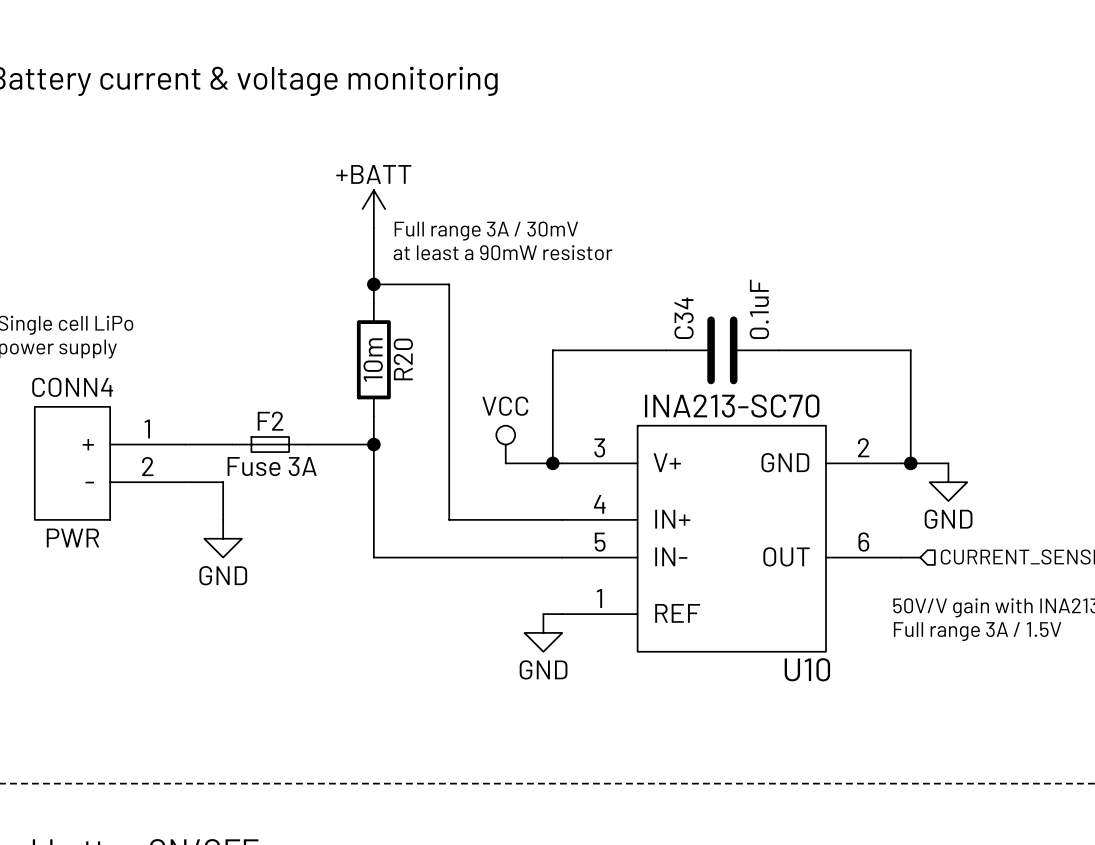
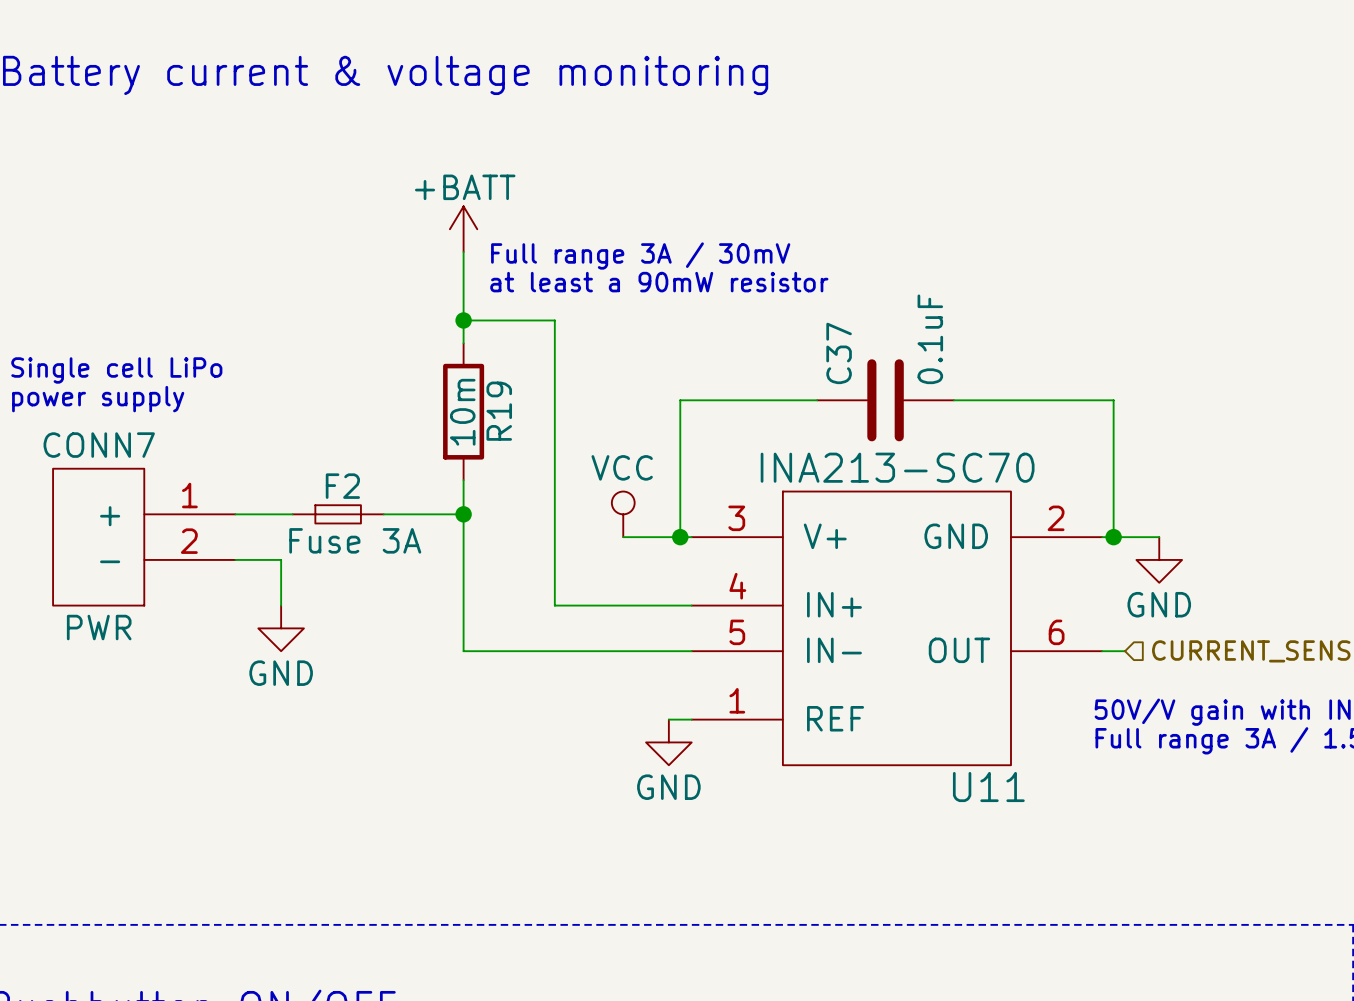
C34 name: C34 (684, 318) -> C37 (839, 353)
R20 name: R20 (403, 359) -> R19 (499, 411)
CONN4 name: CONN4 (72, 387) -> CONN7 (99, 445)
U10 name: U10 (807, 669) -> U11 (988, 787)

